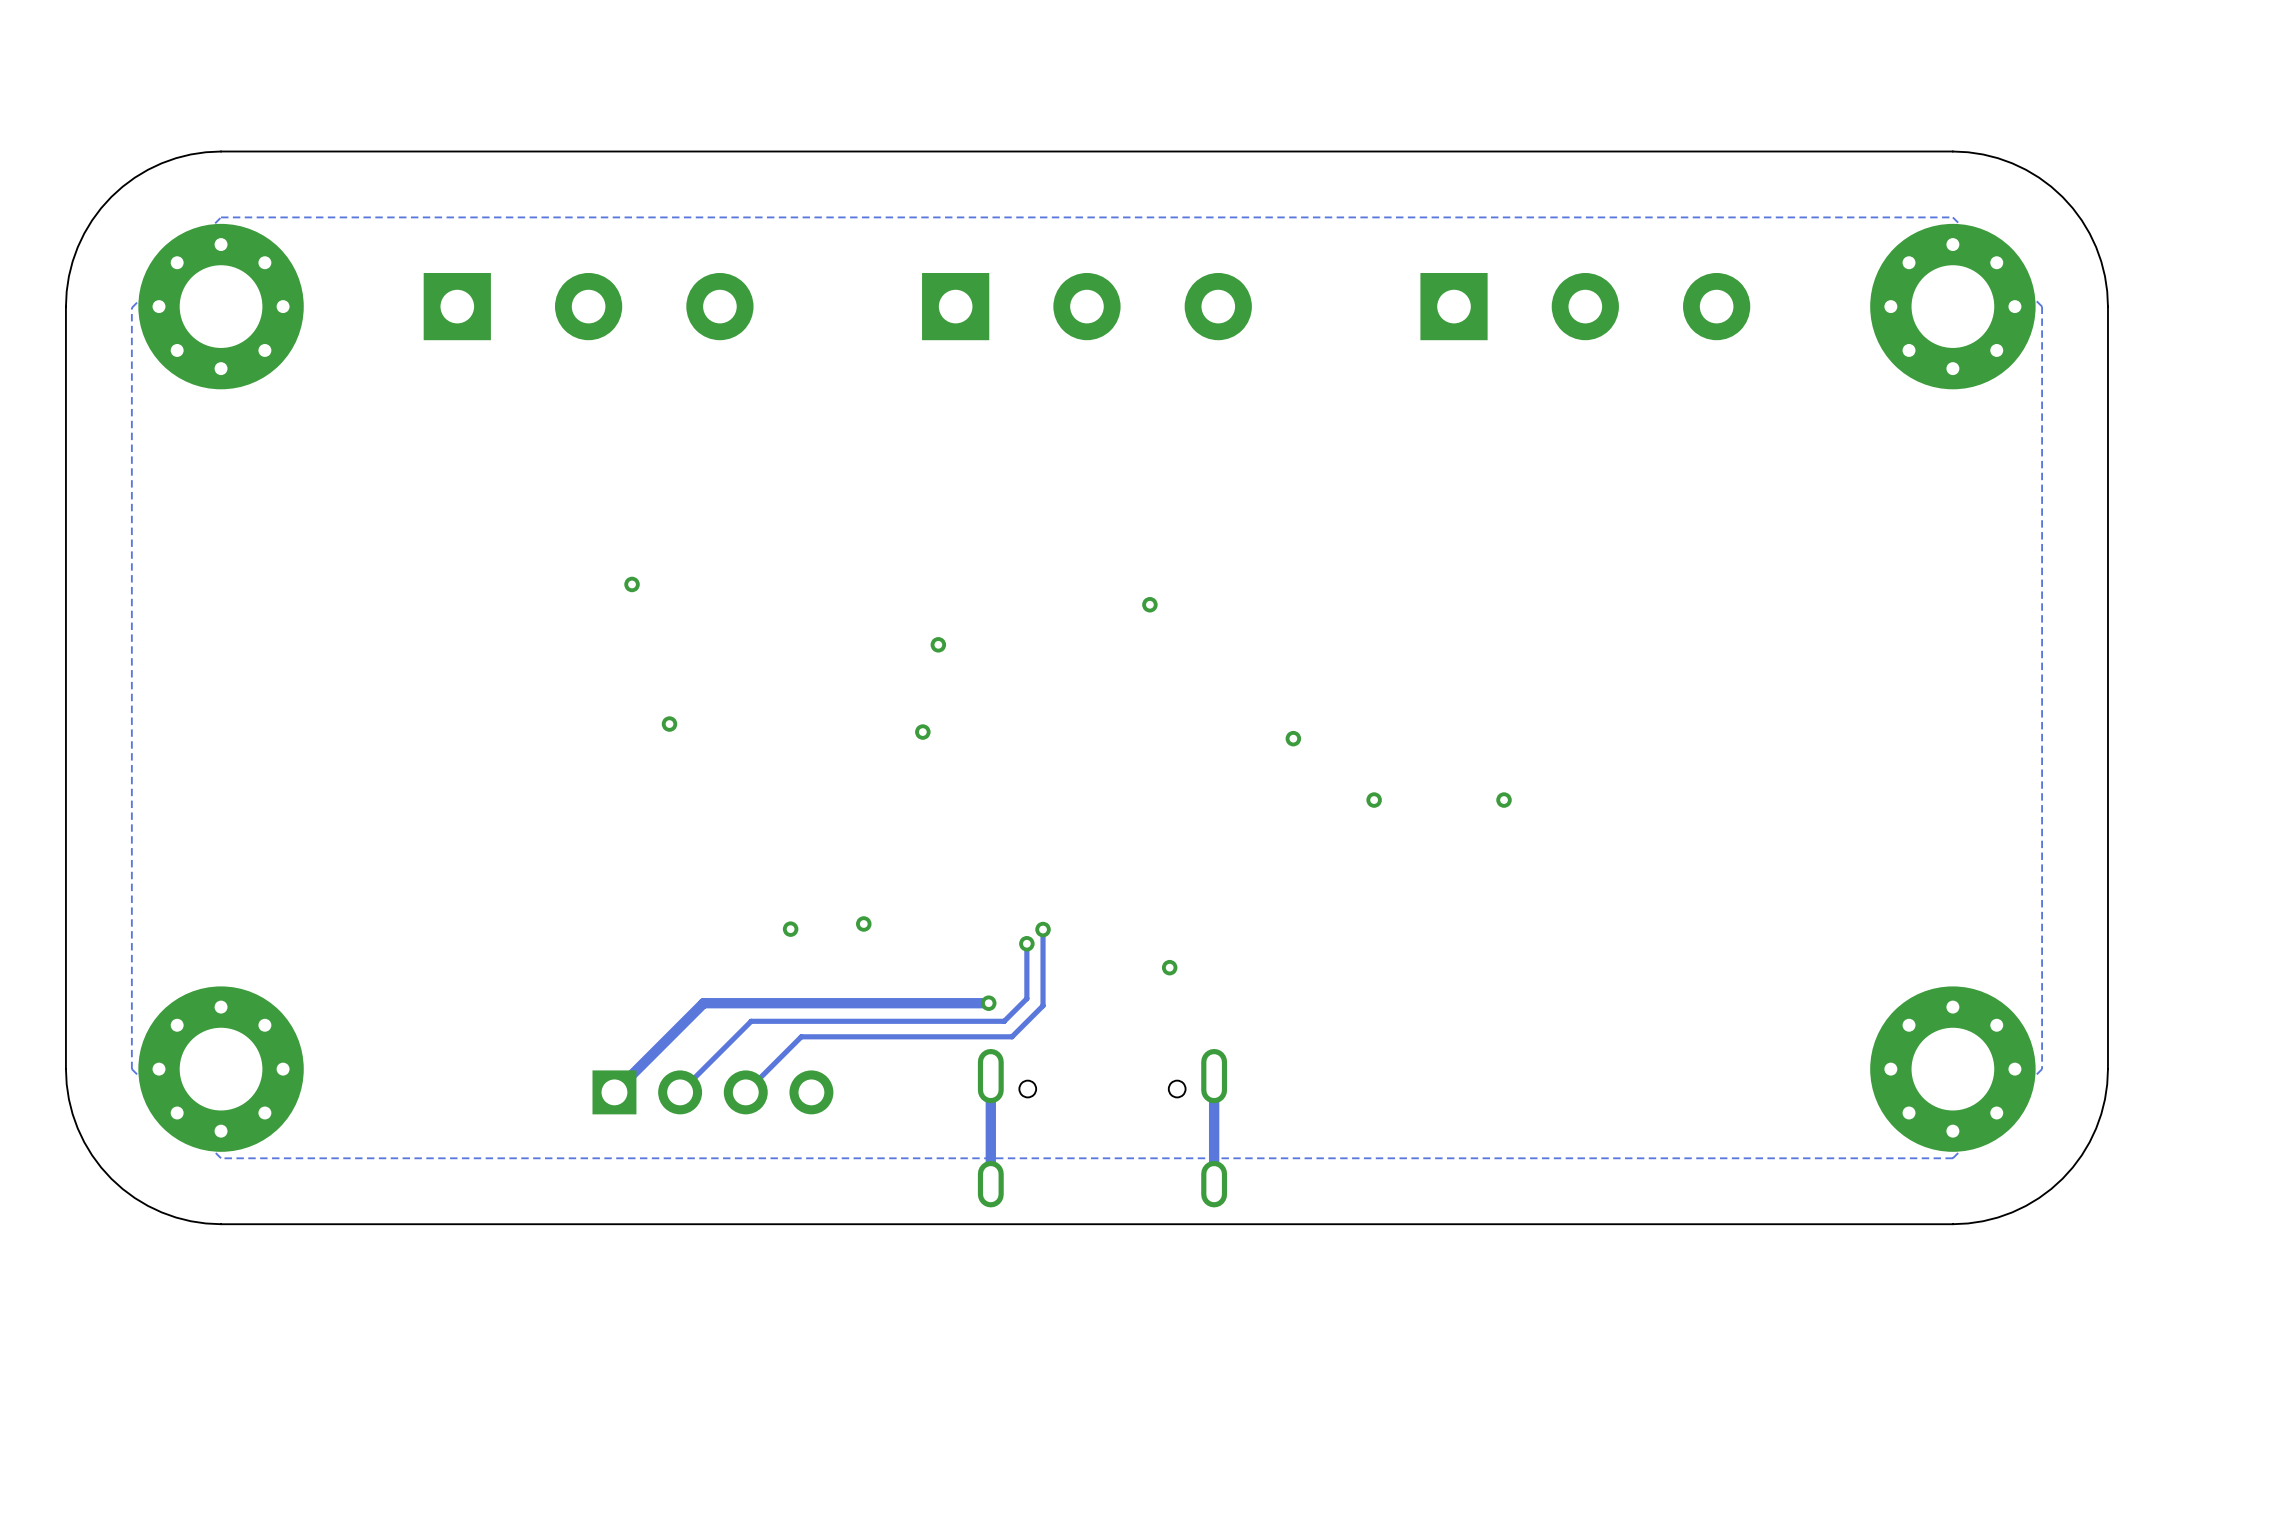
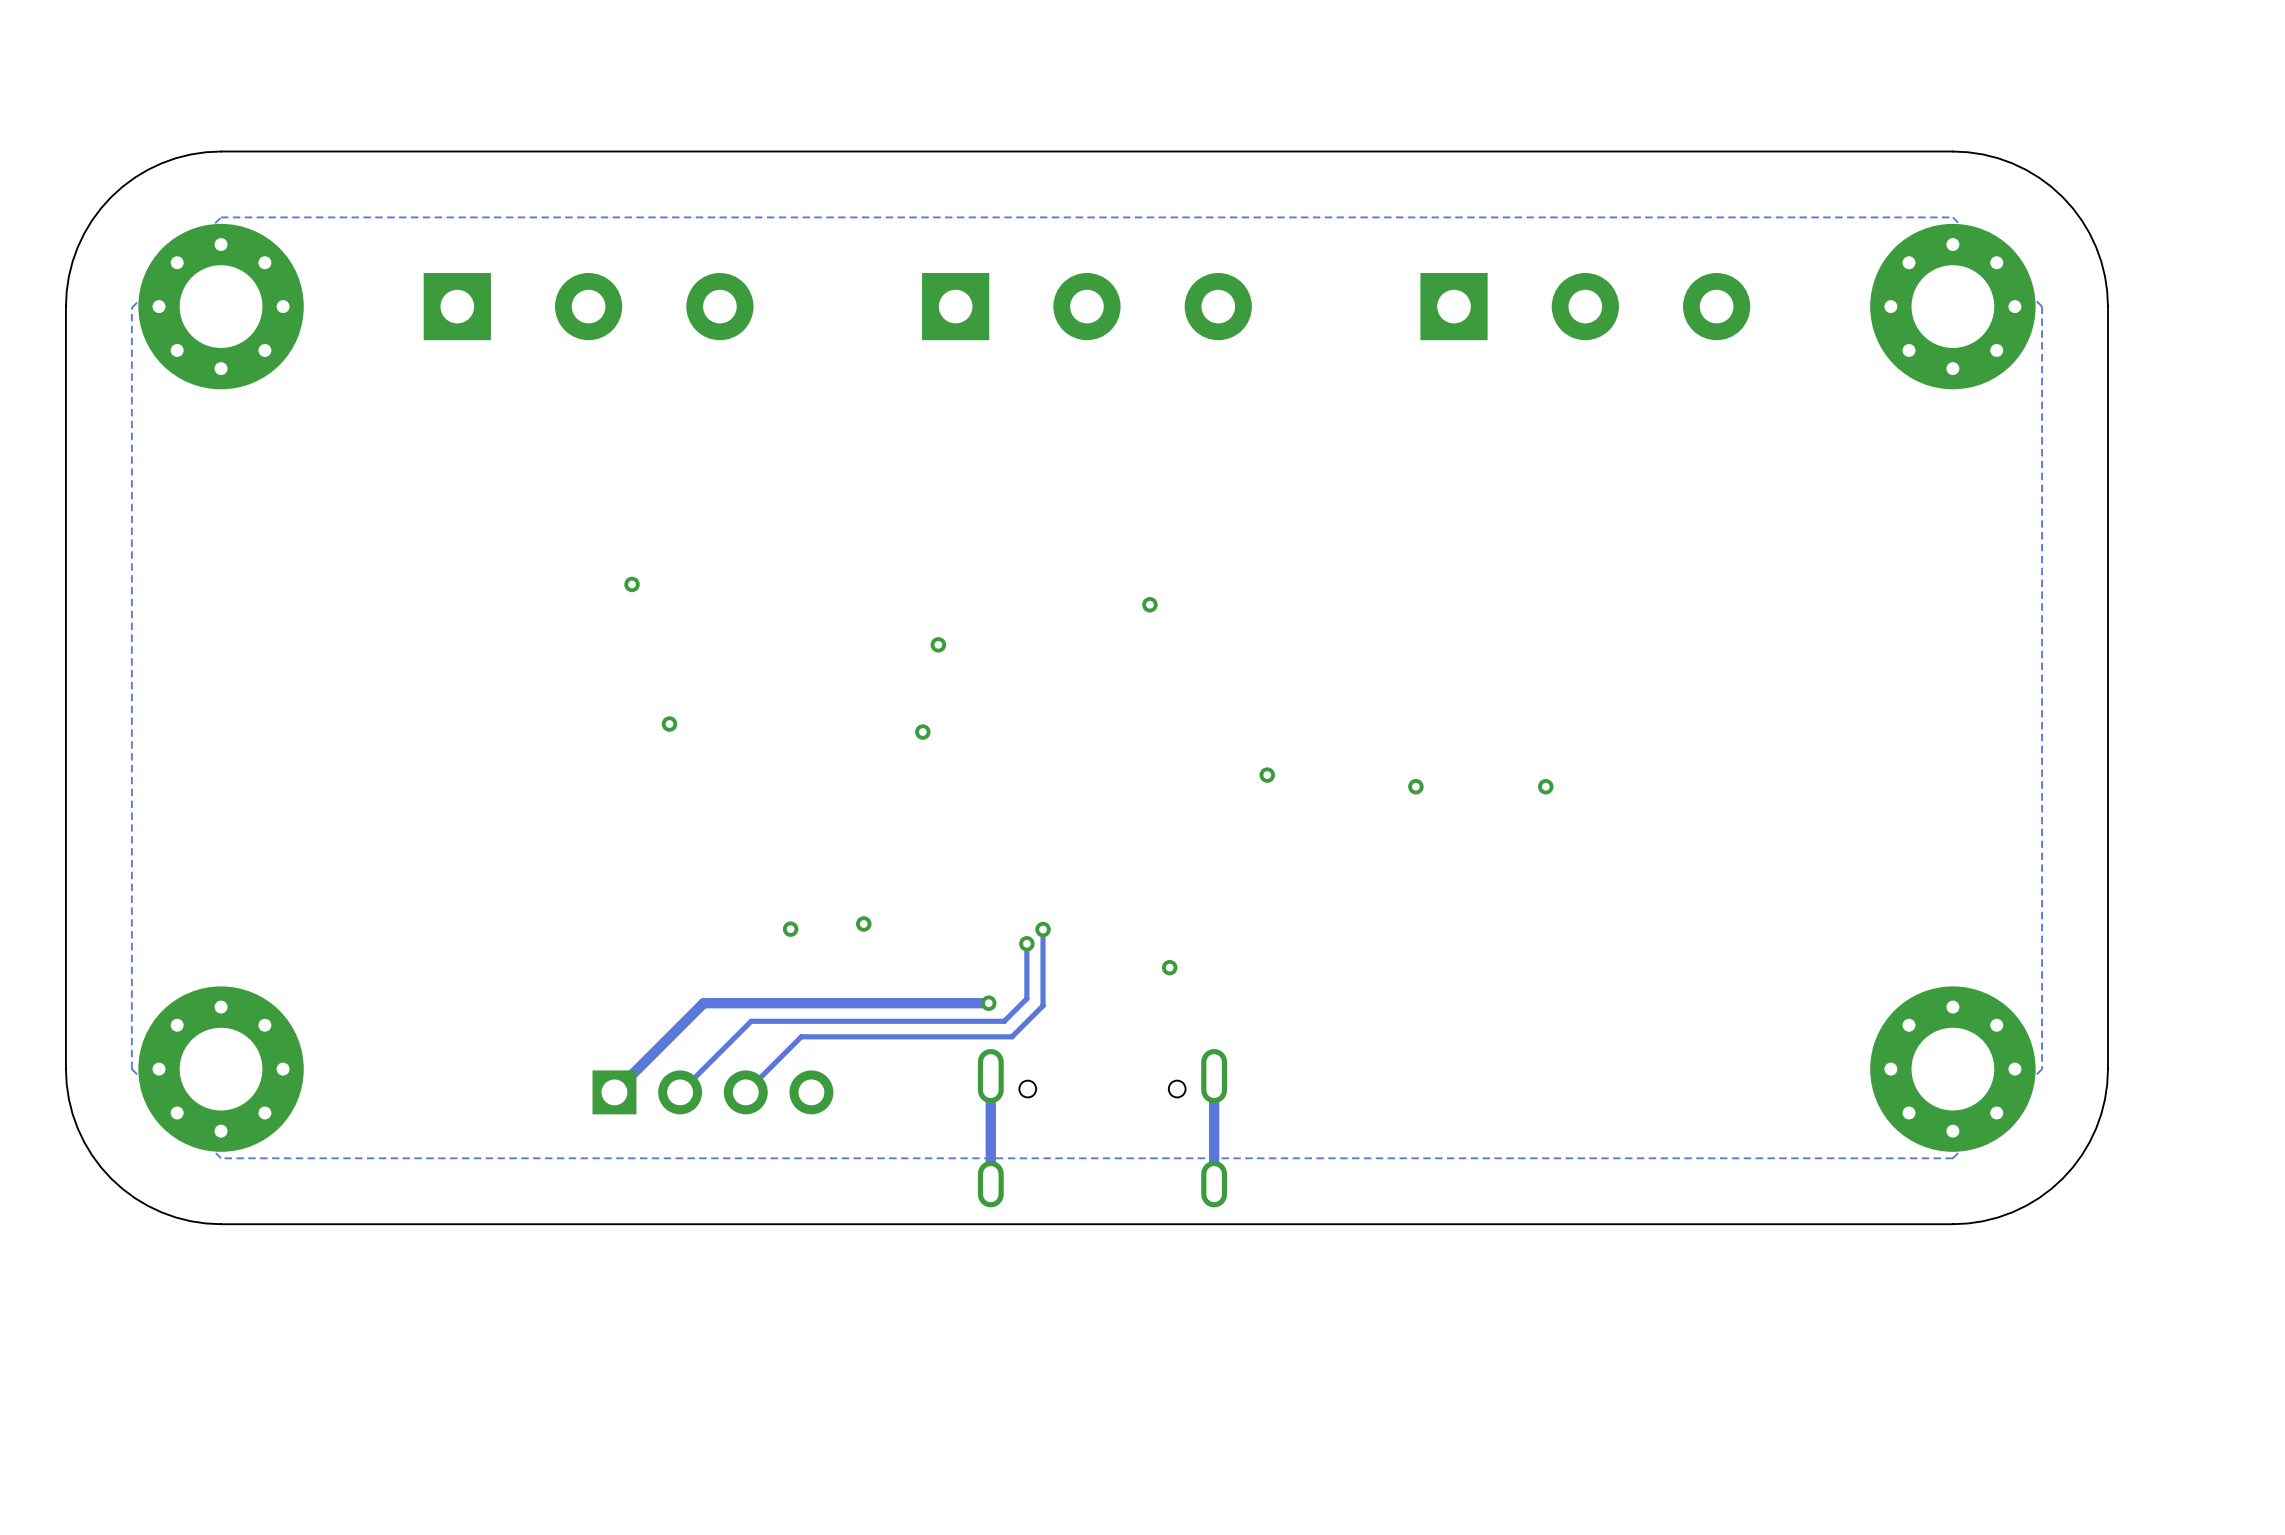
via position: (1293, 738) -> (1267, 775)
via position: (1374, 800) -> (1415, 786)
via position: (1504, 800) -> (1545, 786)

